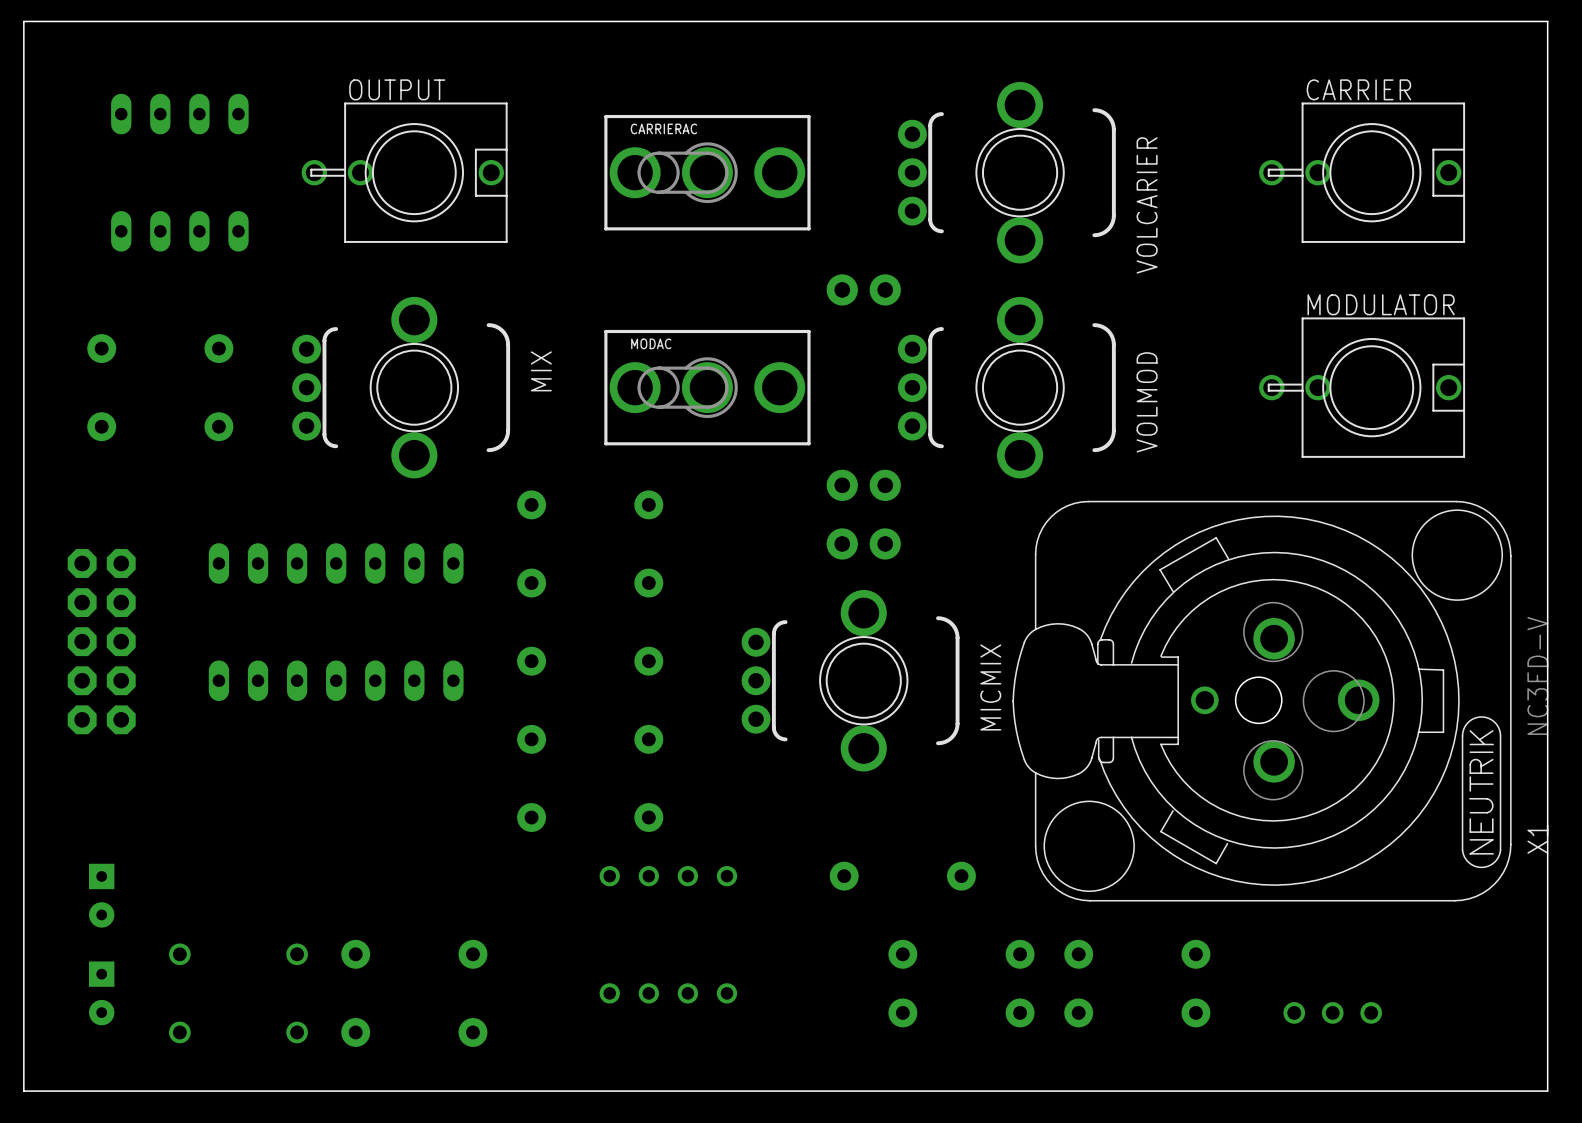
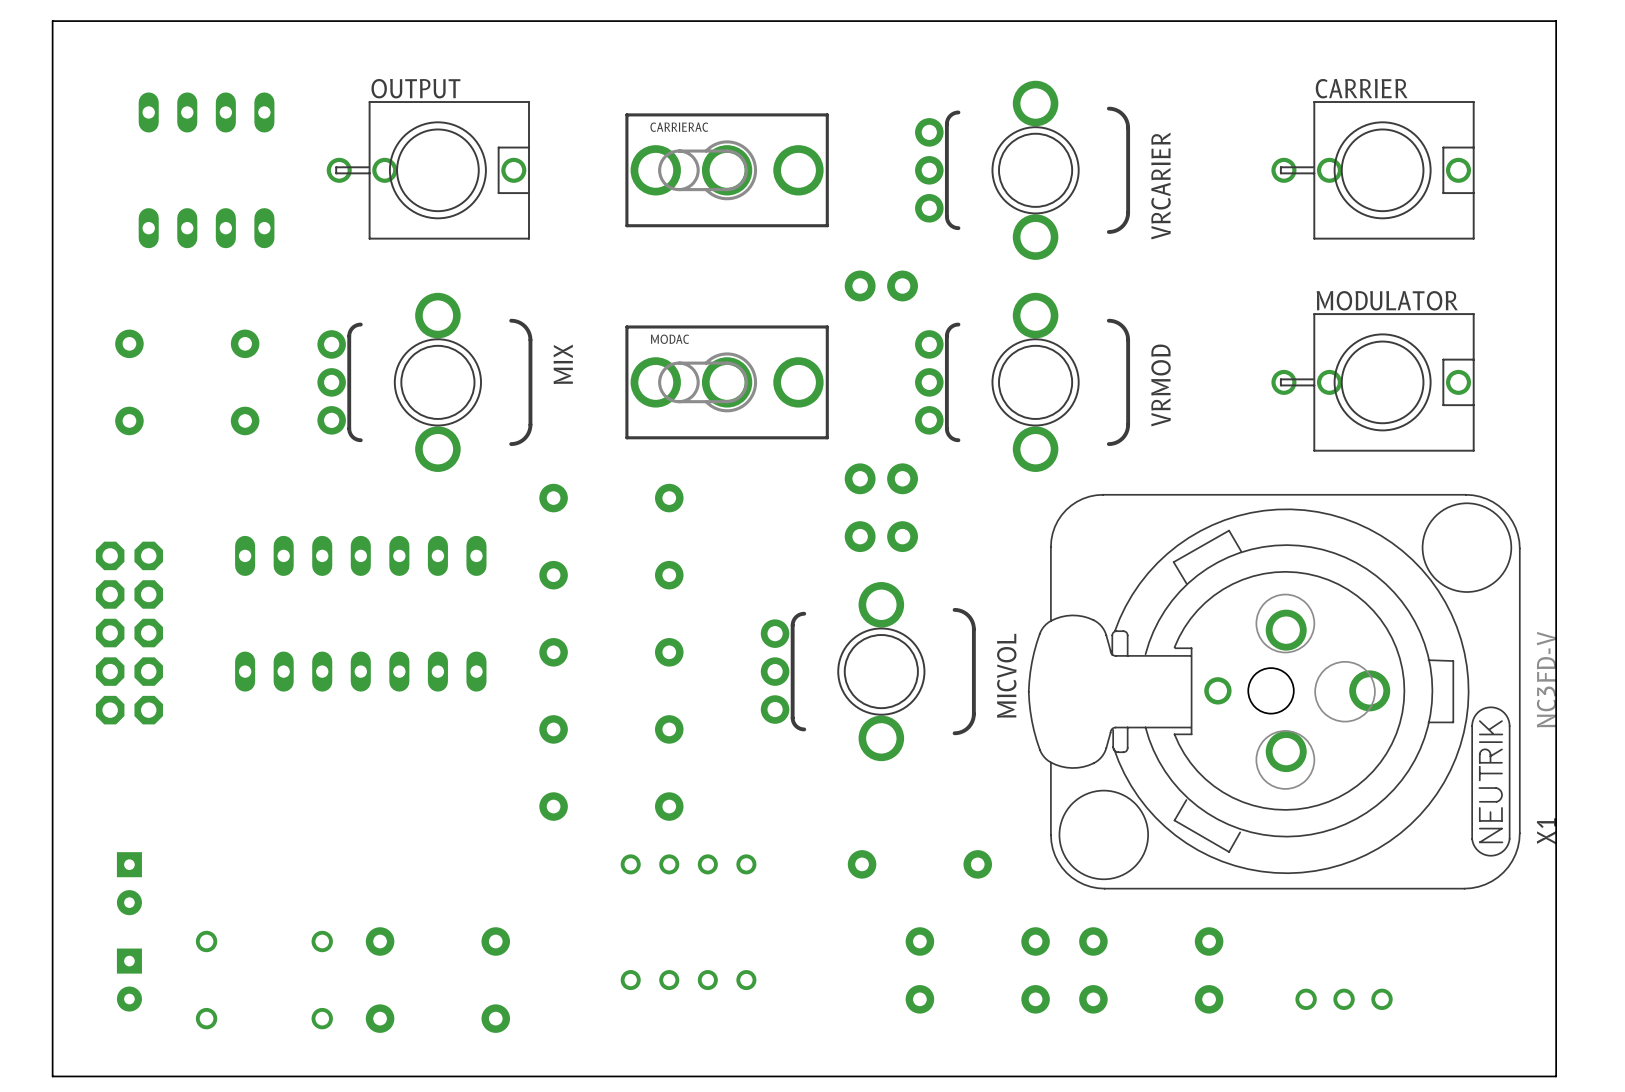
VOLCARIER name: VOLCARIER (1147, 205) -> VRCARIER (1161, 185)
VOLMOD name: VOLMOD (1147, 402) -> VRMOD (1161, 385)
MICMIX name: MICMIX (990, 687) -> MICVOL (1006, 675)

